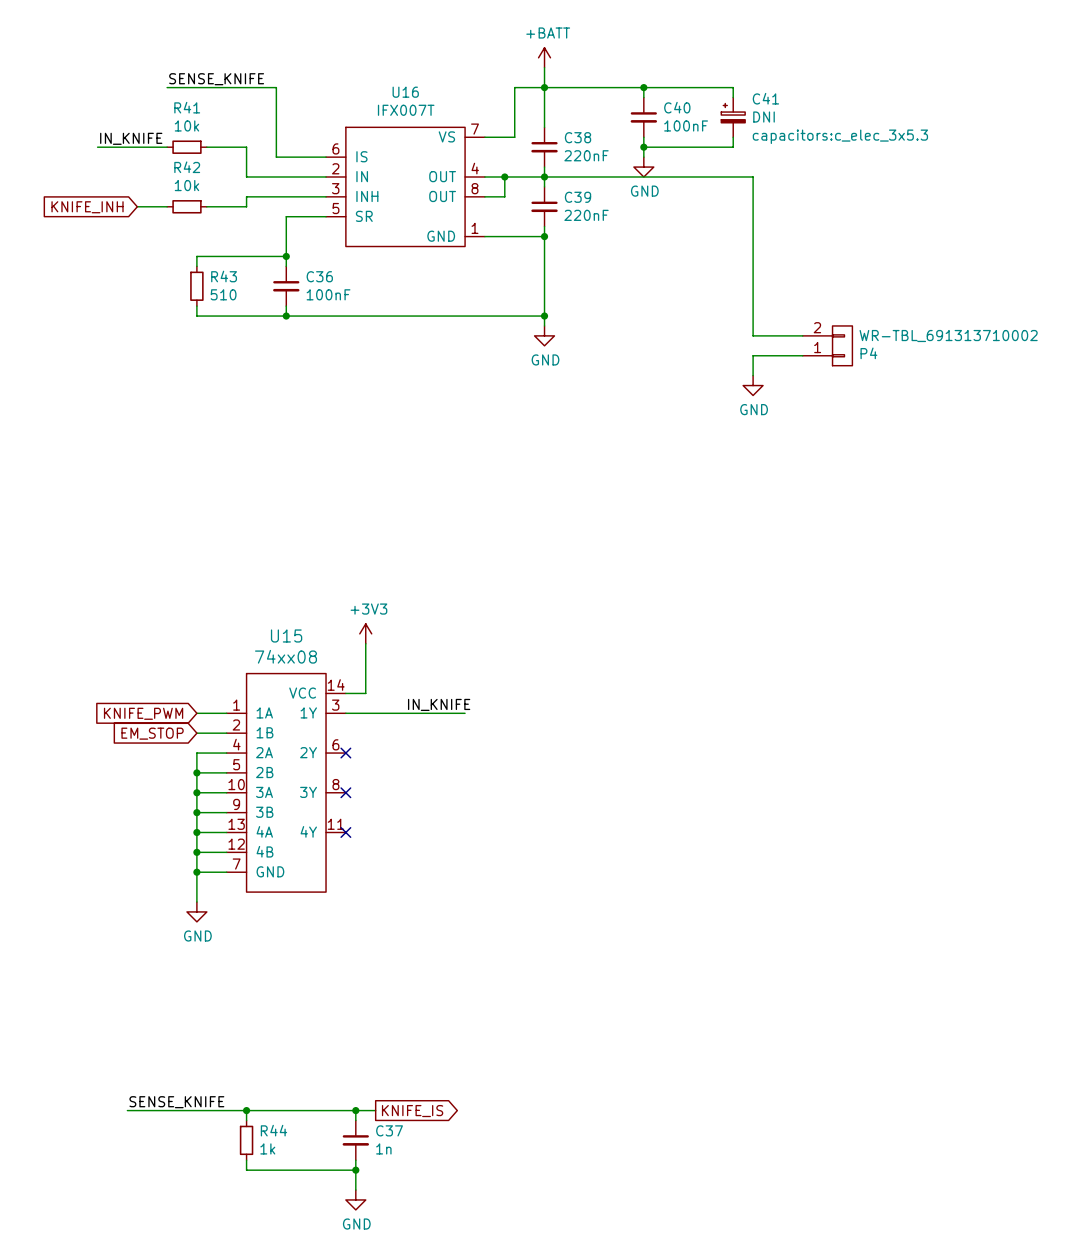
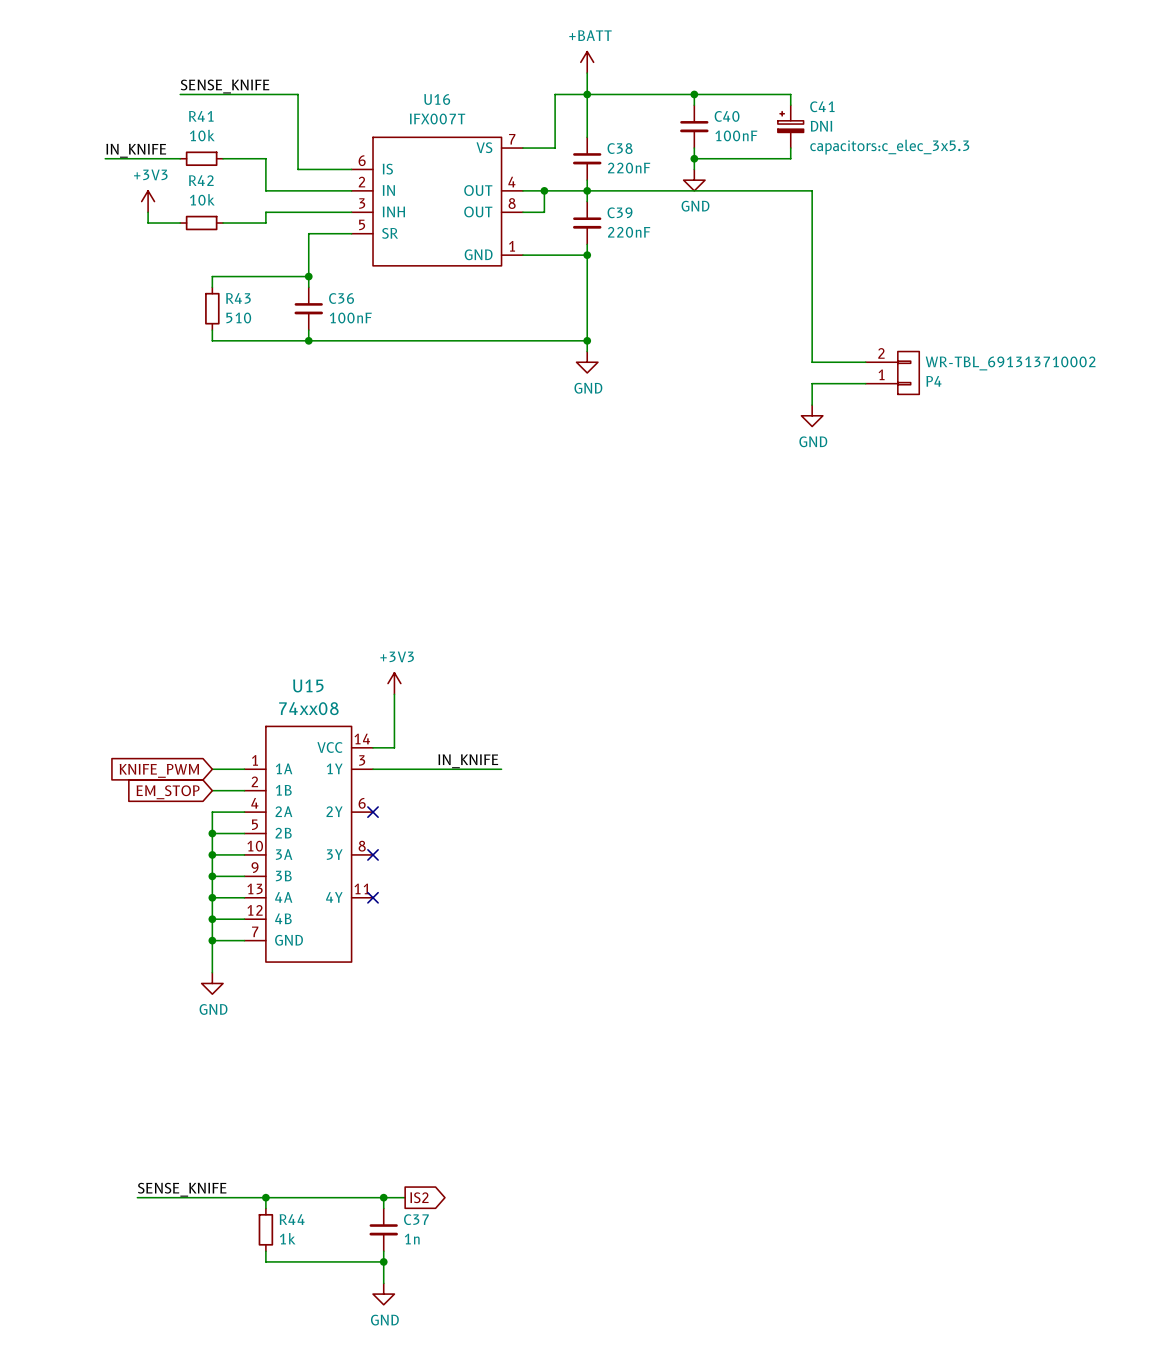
power symbol: none -> +3V3 (148, 201)
wire: none -> (148, 212) (148, 223)
global label: KNIFE_INH (87, 207) -> none
global label: KNIFE_IS (412, 1111) -> IS2 (419, 1197)

